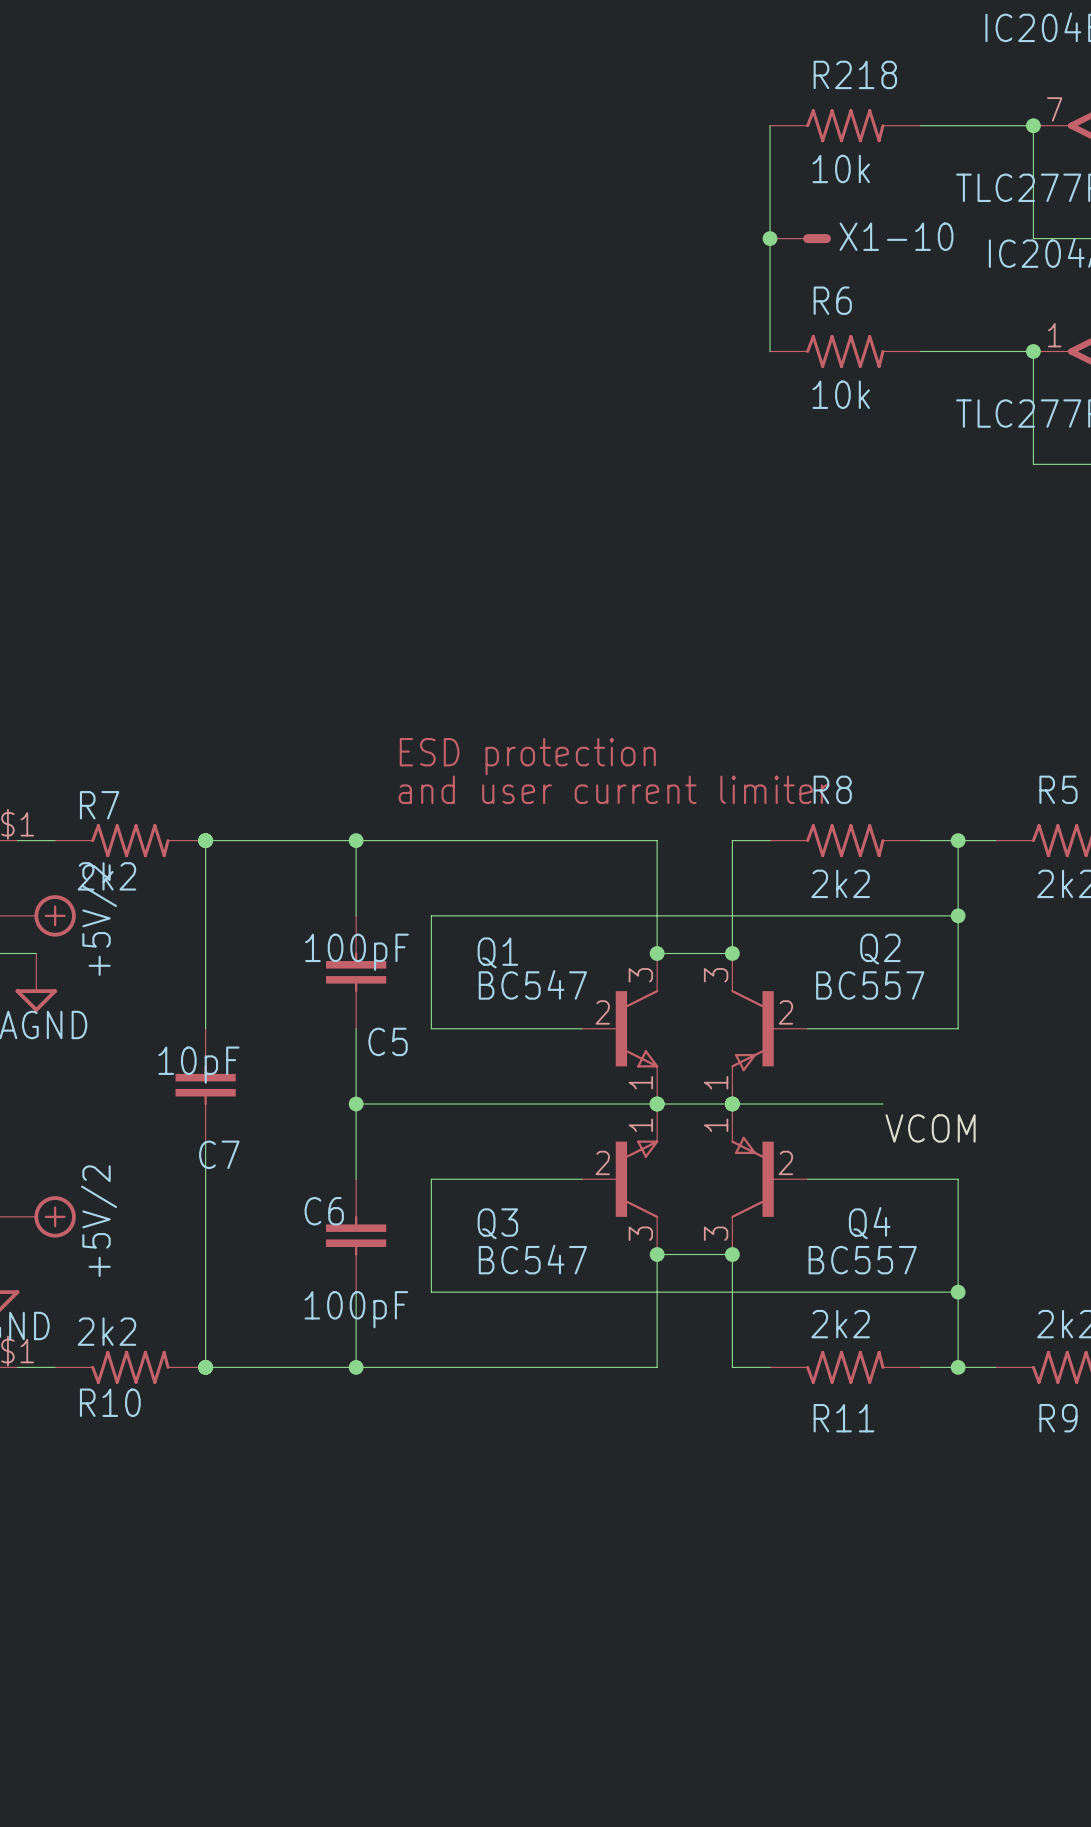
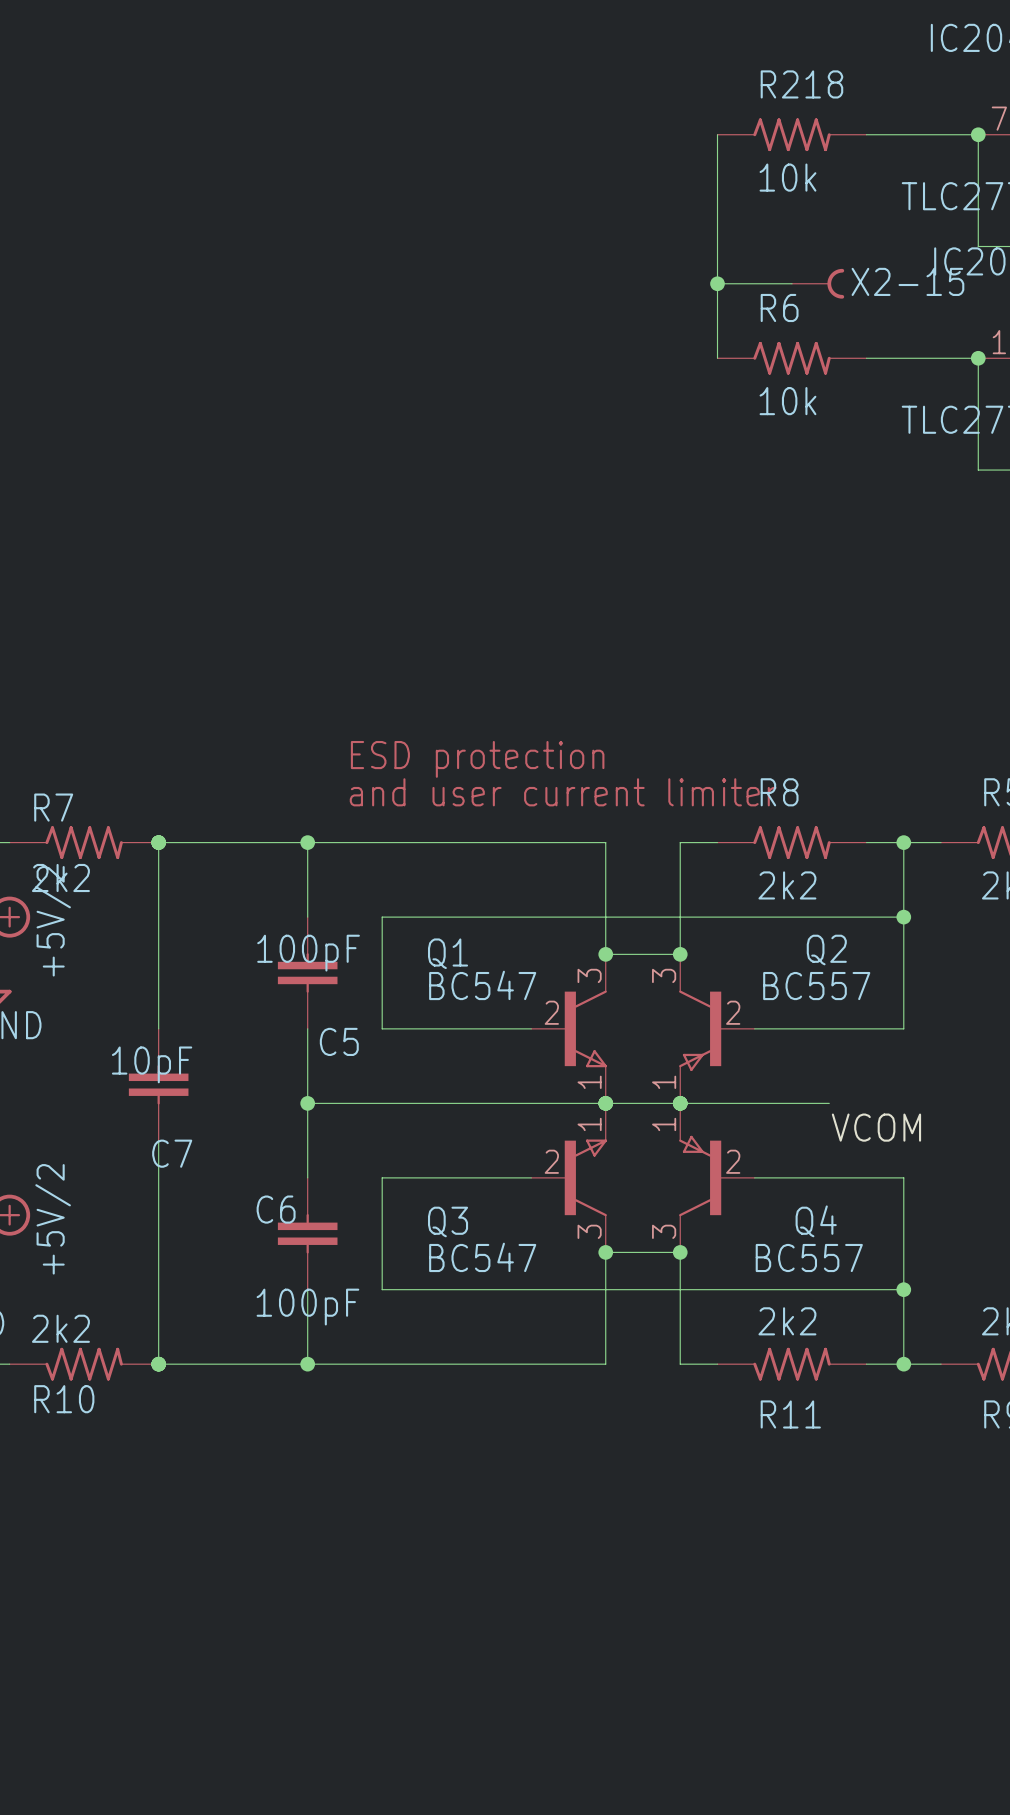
junction position: (770, 238) -> (717, 283)
X1-10: (800, 238) -> none
wire: none -> (717, 283) (792, 283)
X2-15: none -> (818, 283)

